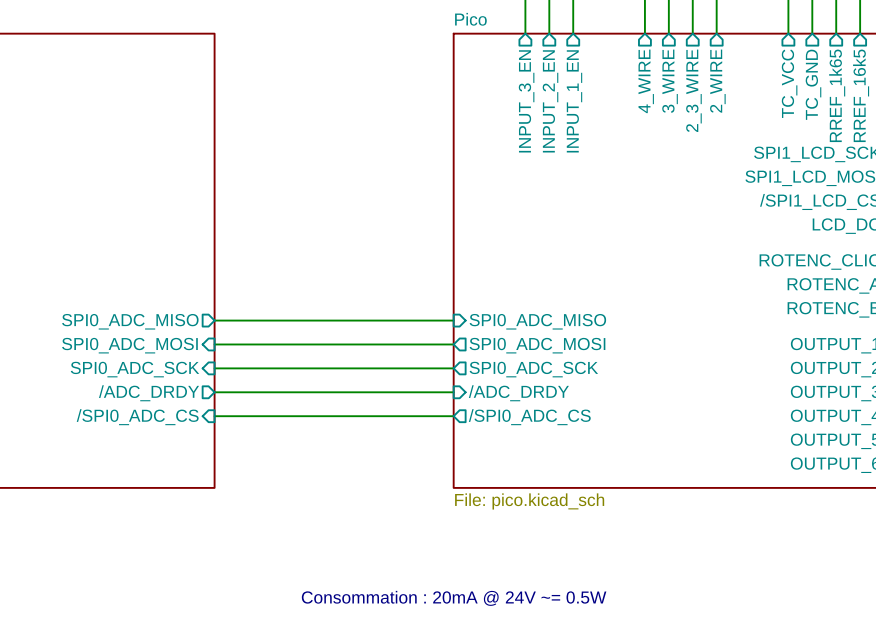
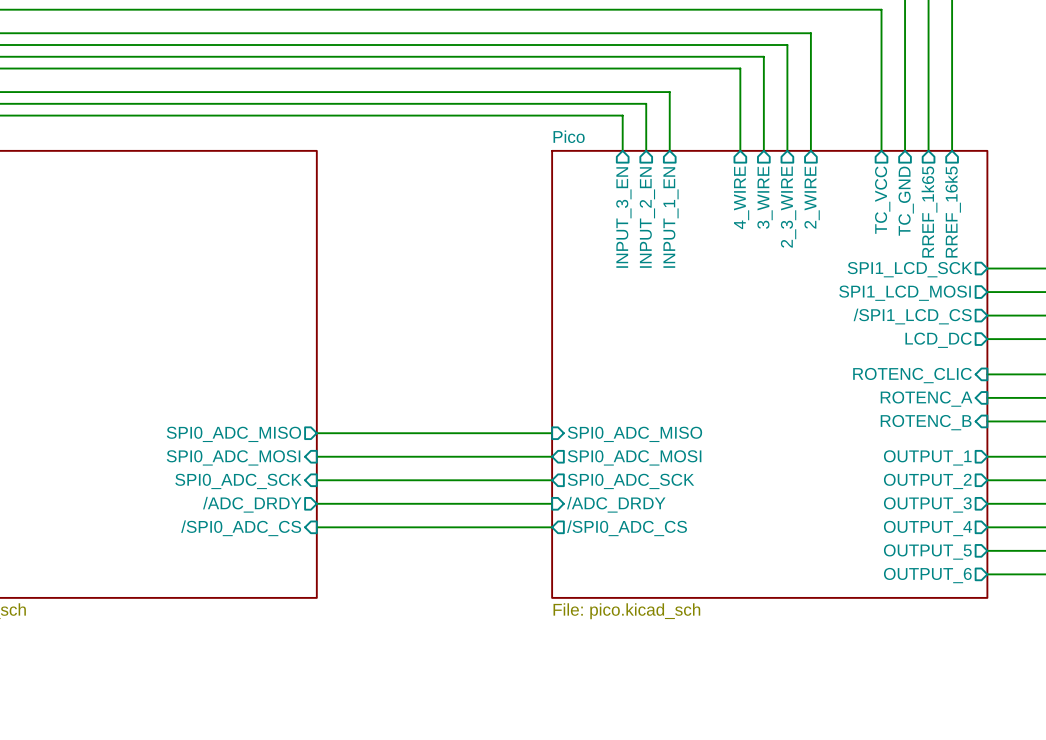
text: Consommation : 20mA @ 24V ~= 0.5W (454, 598) -> none

